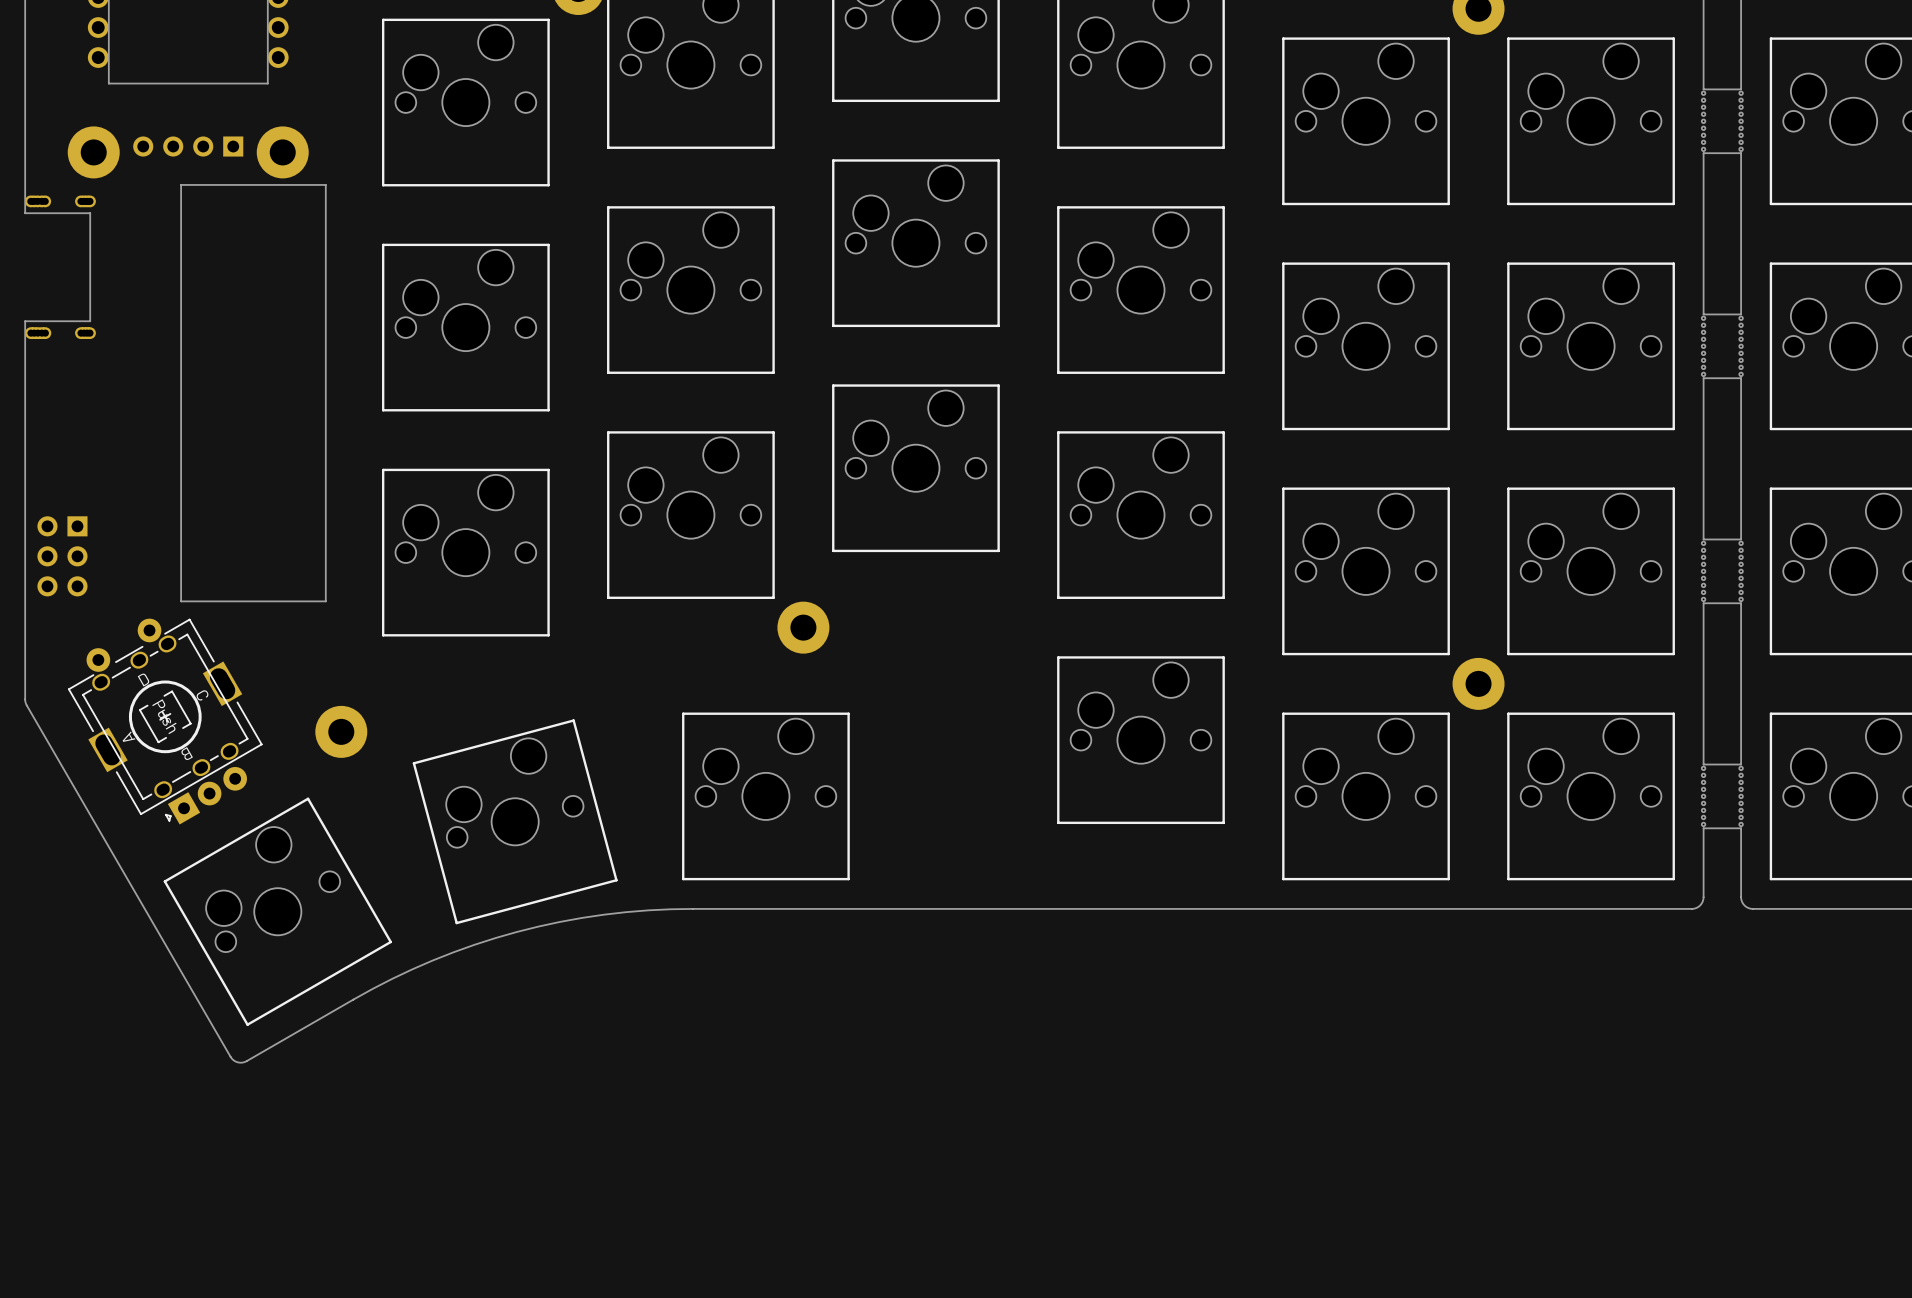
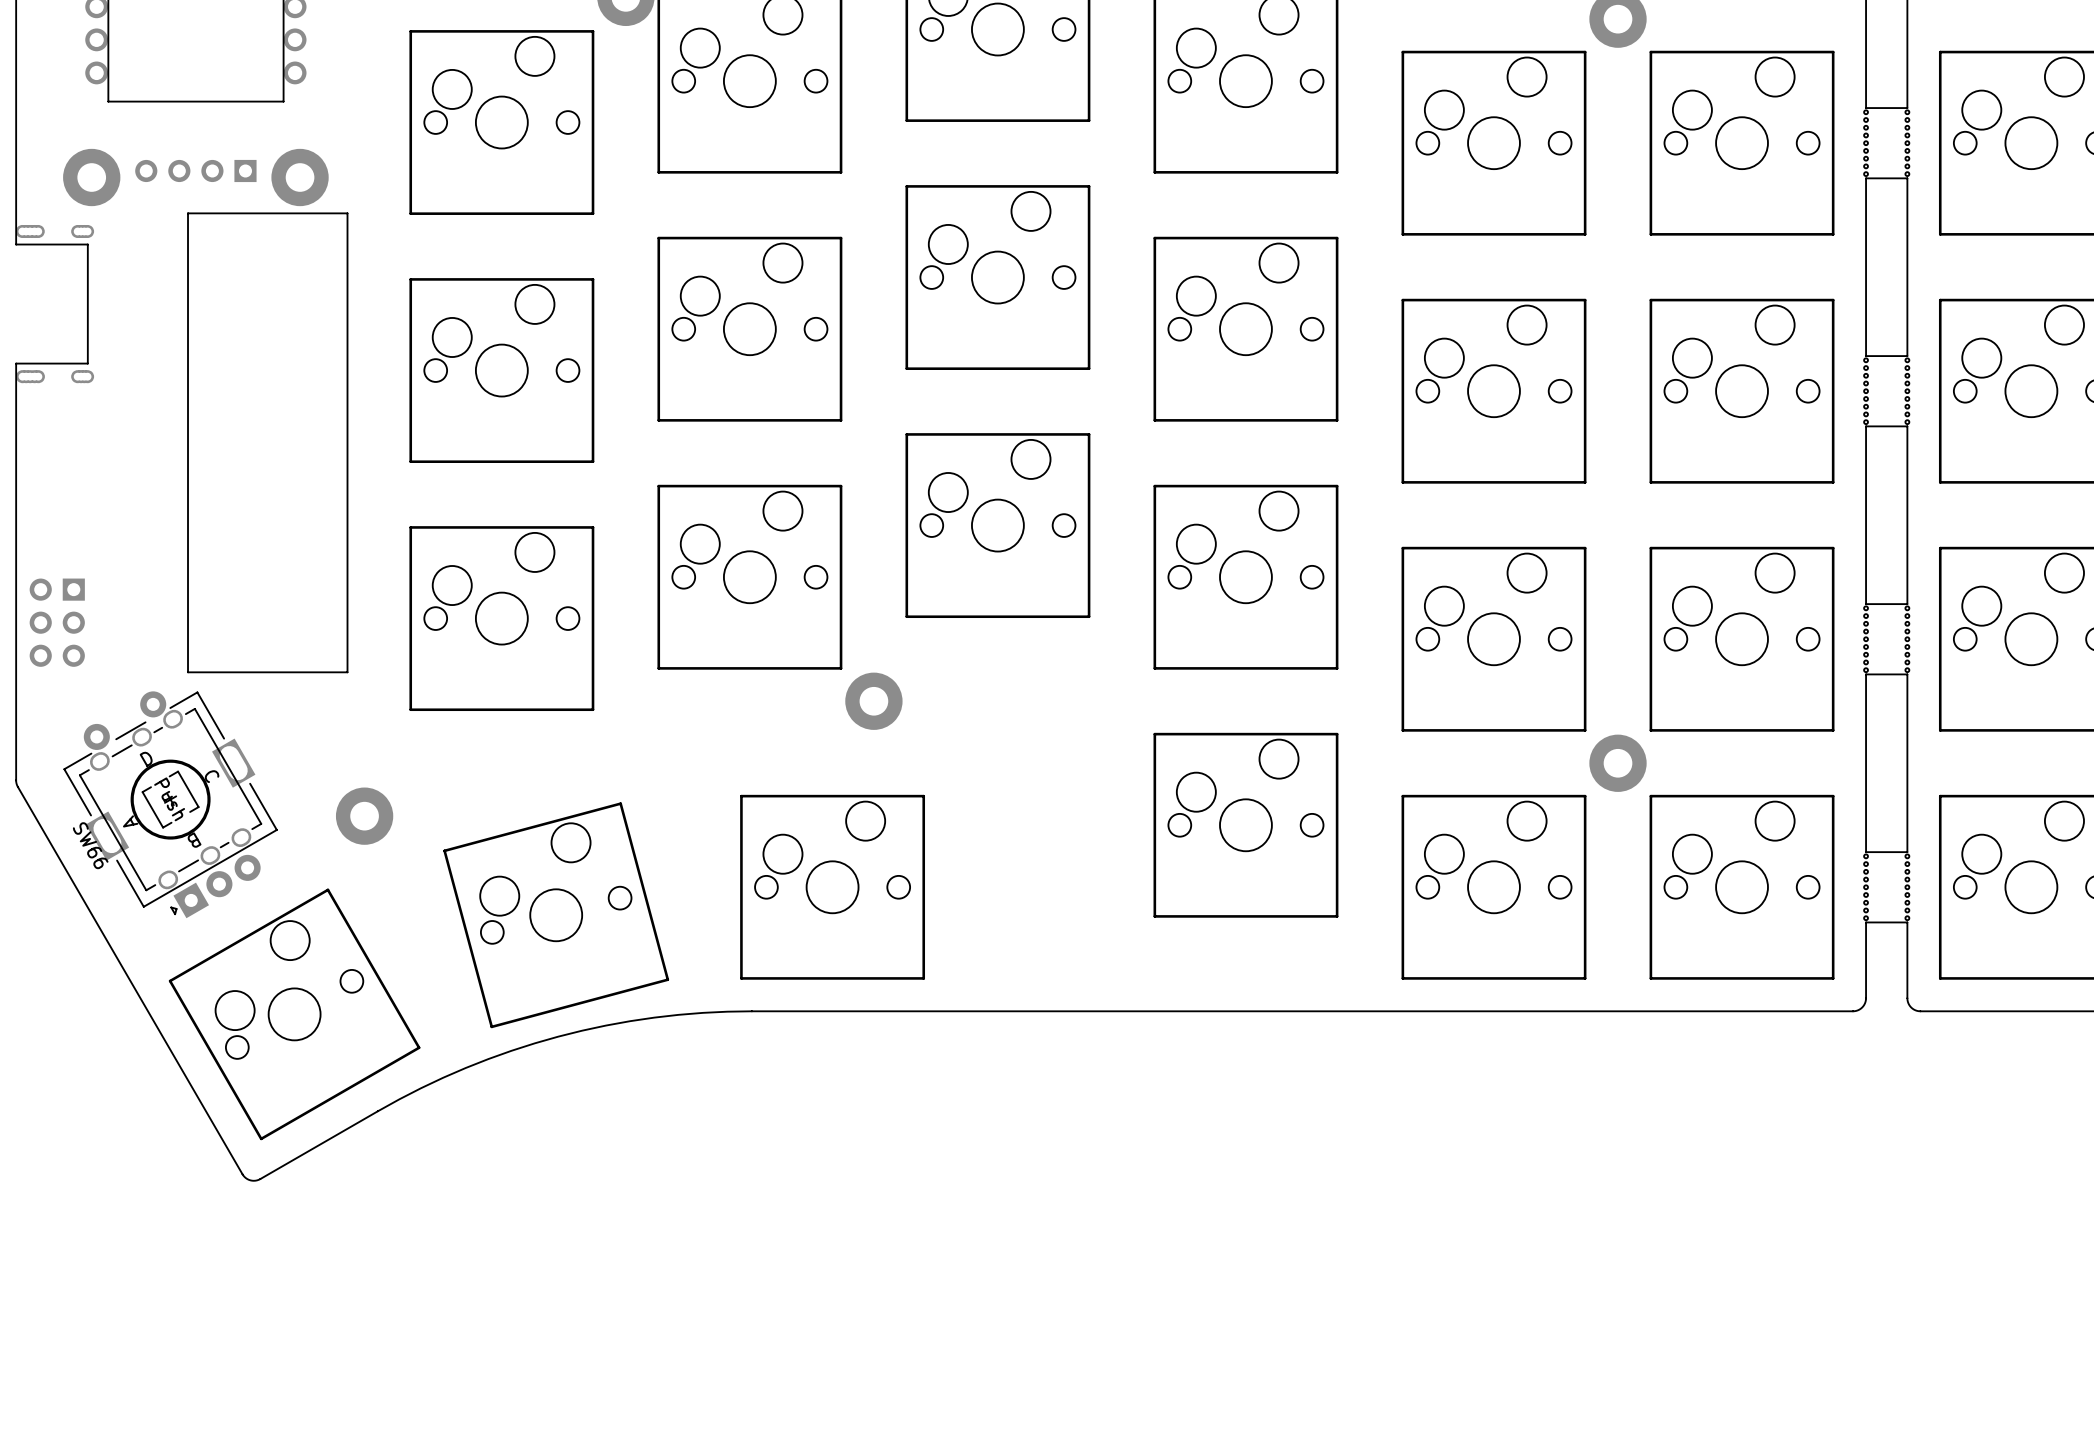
SW66 name: none -> SW66 (90, 845)

